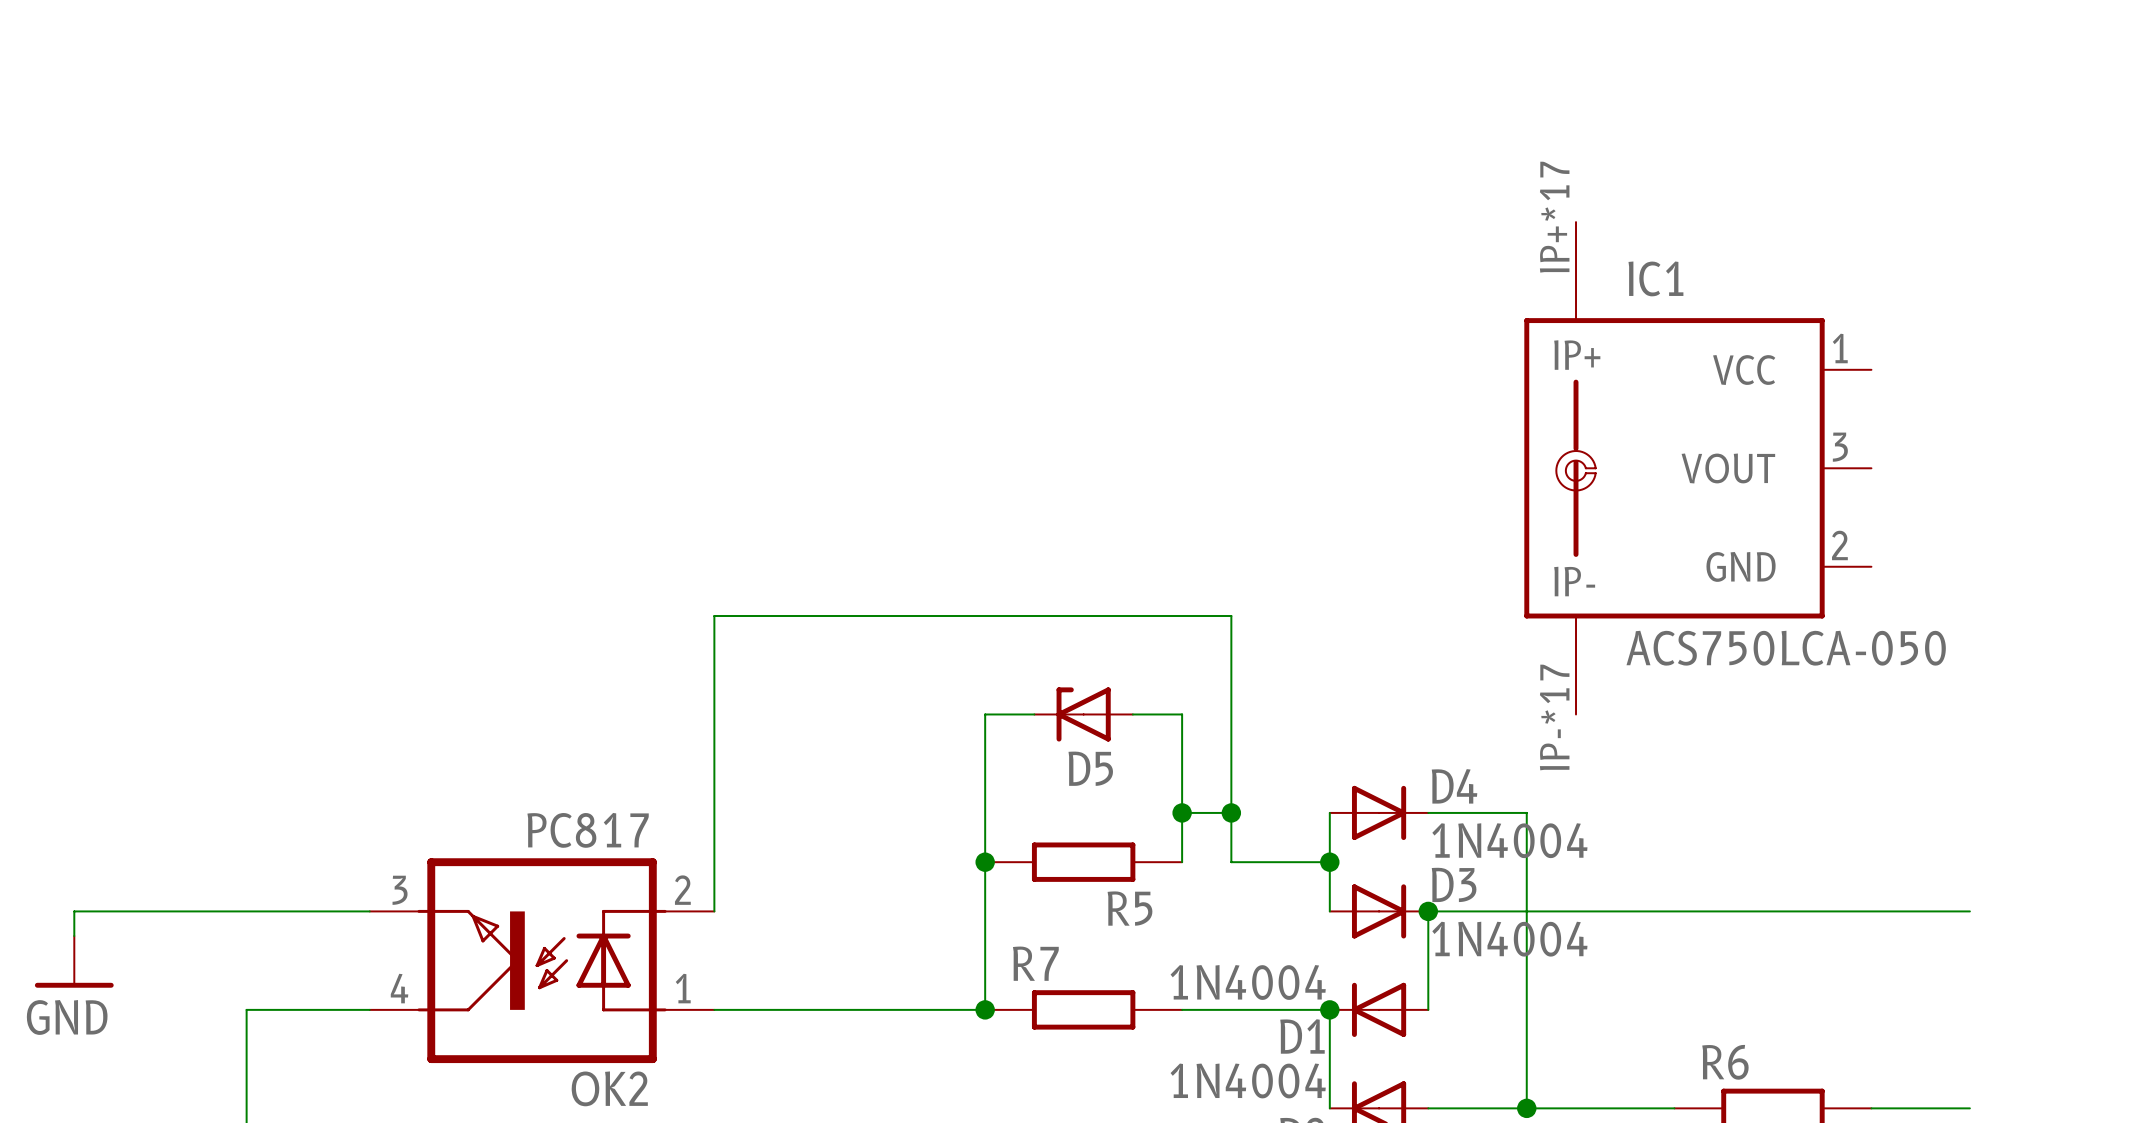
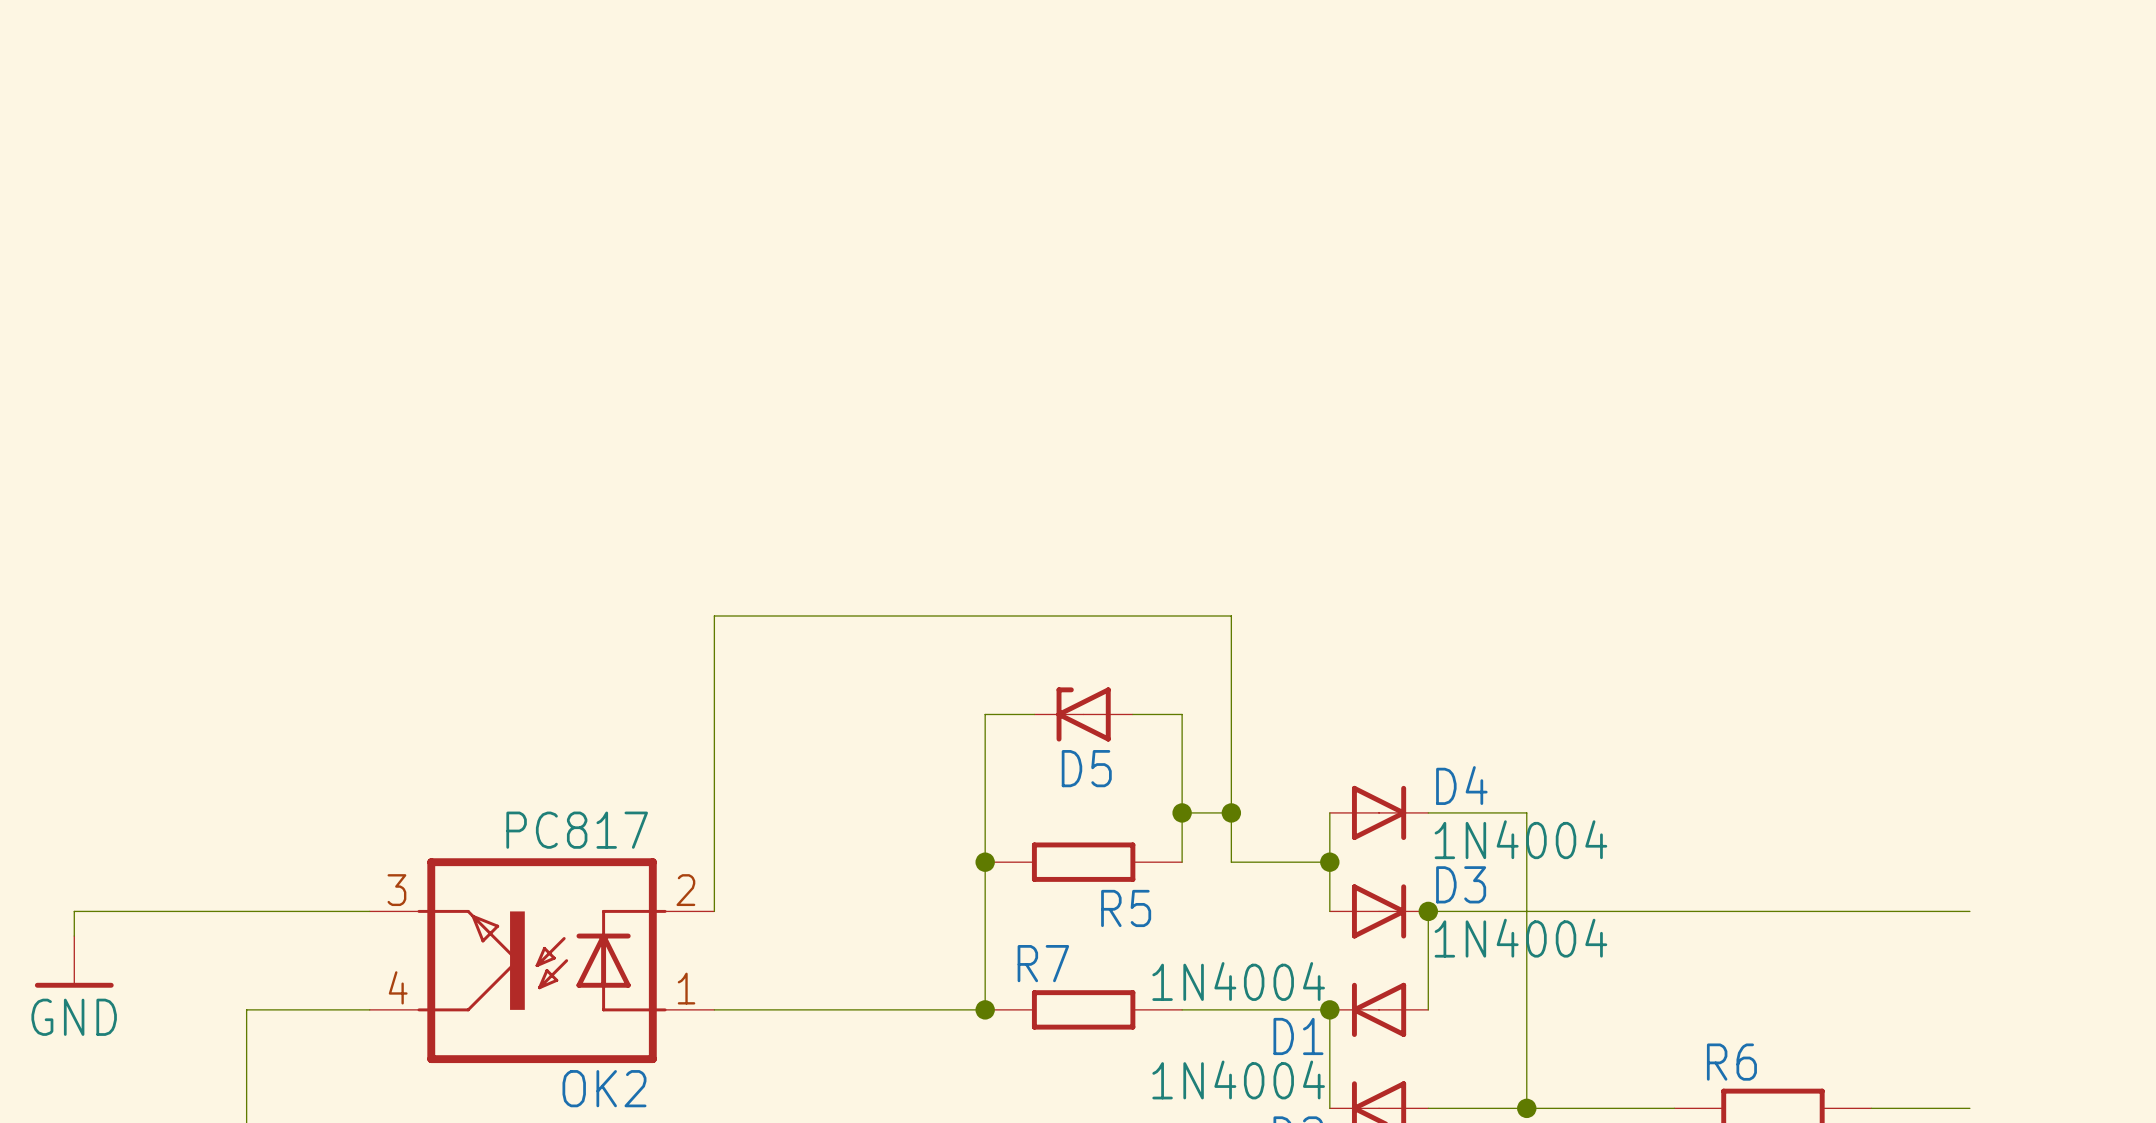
IC1: ACS750LCA-050 (1697, 468) -> none

